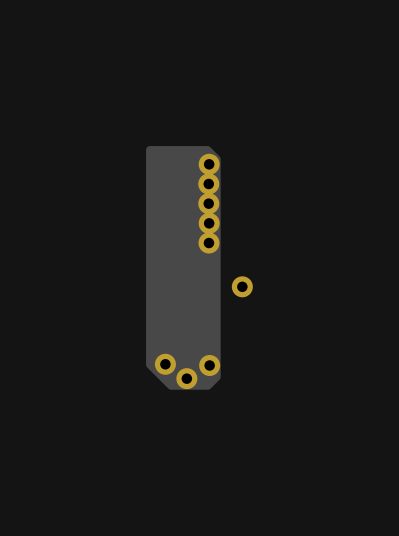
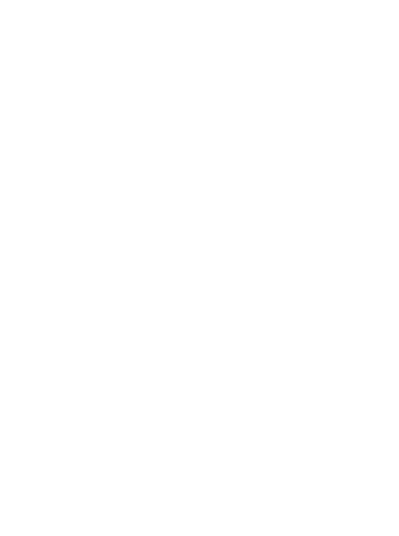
drawing: [146, 146, 221, 390] -> none
via: (209, 164) -> none
via: (208, 183) -> none
via: (208, 203) -> none
via: (209, 223) -> none
via: (208, 243) -> none
via: (242, 286) -> none
via: (165, 364) -> none
via: (209, 365) -> none
via: (186, 378) -> none

